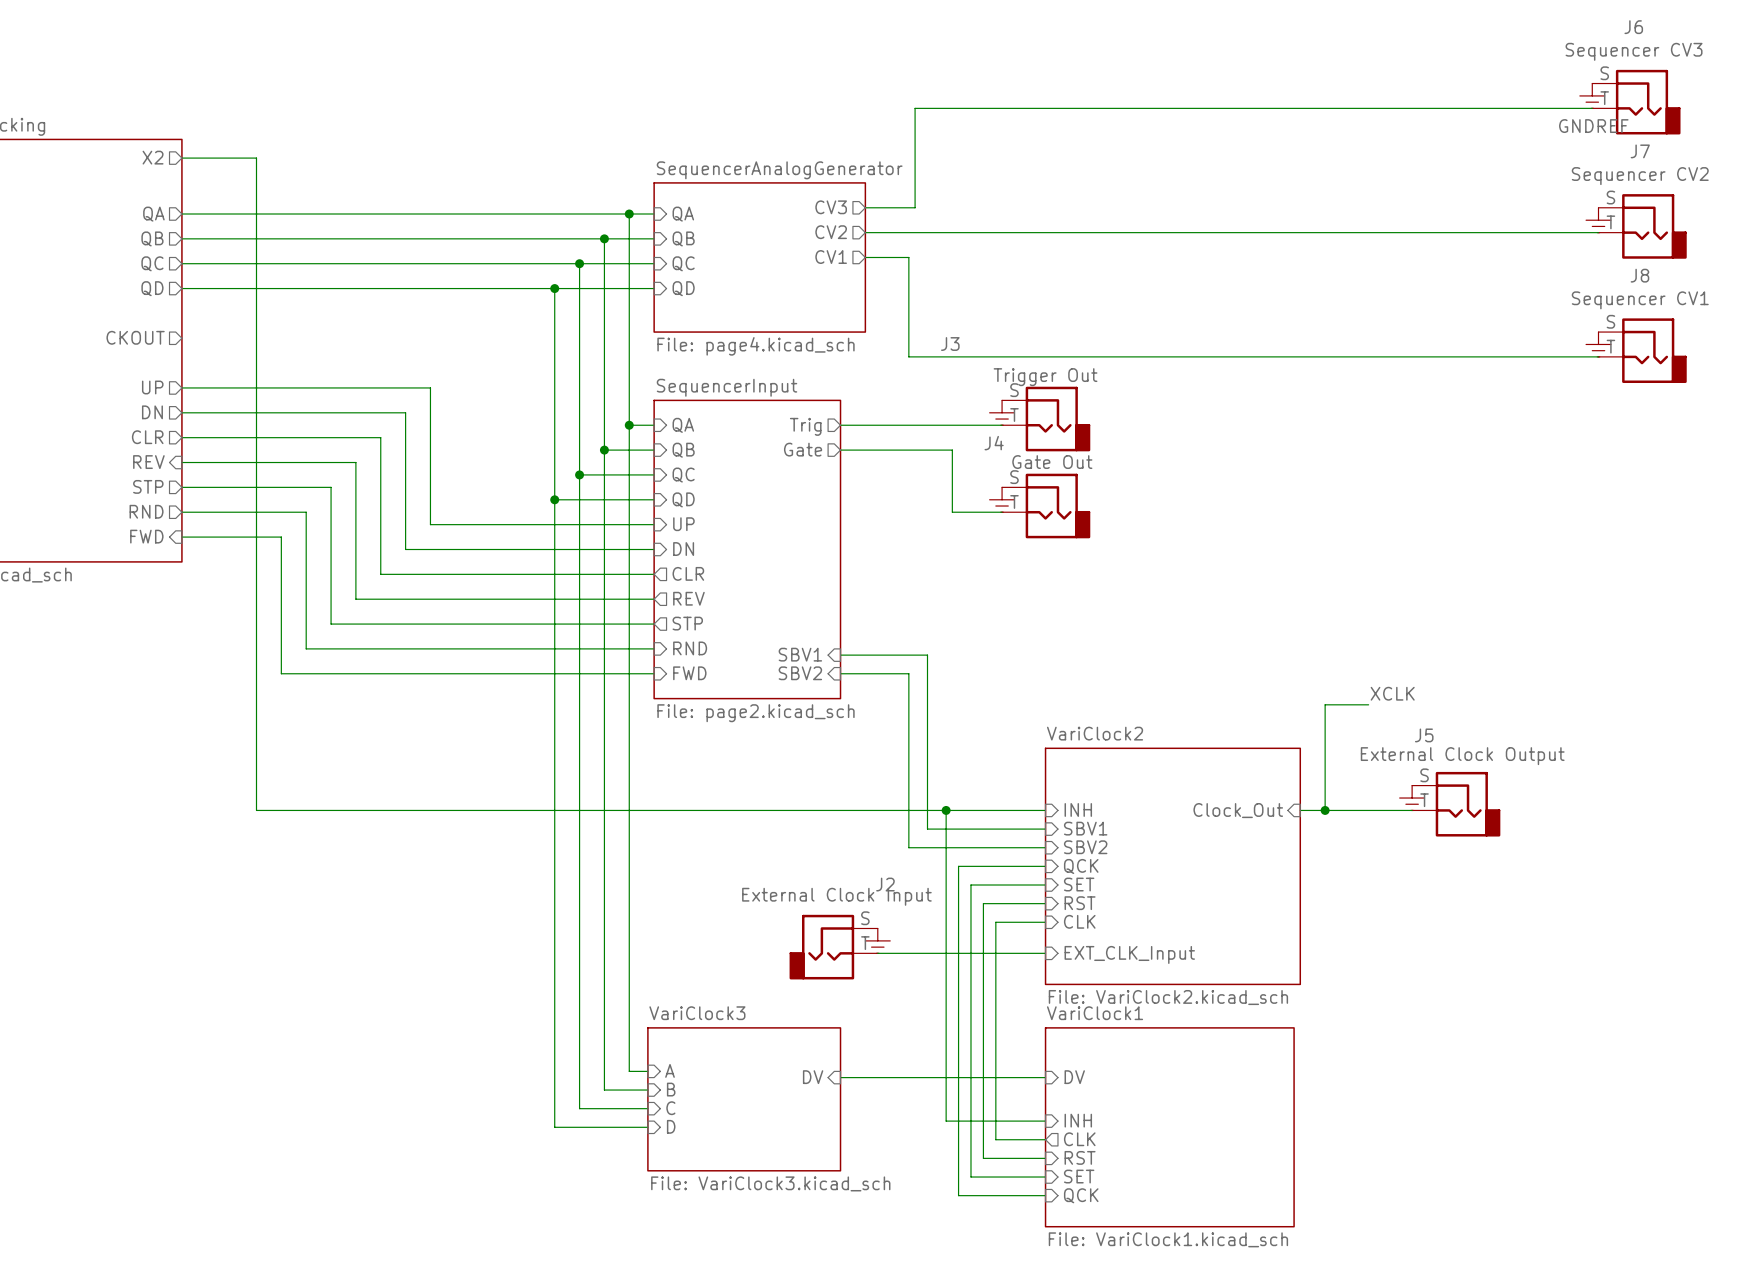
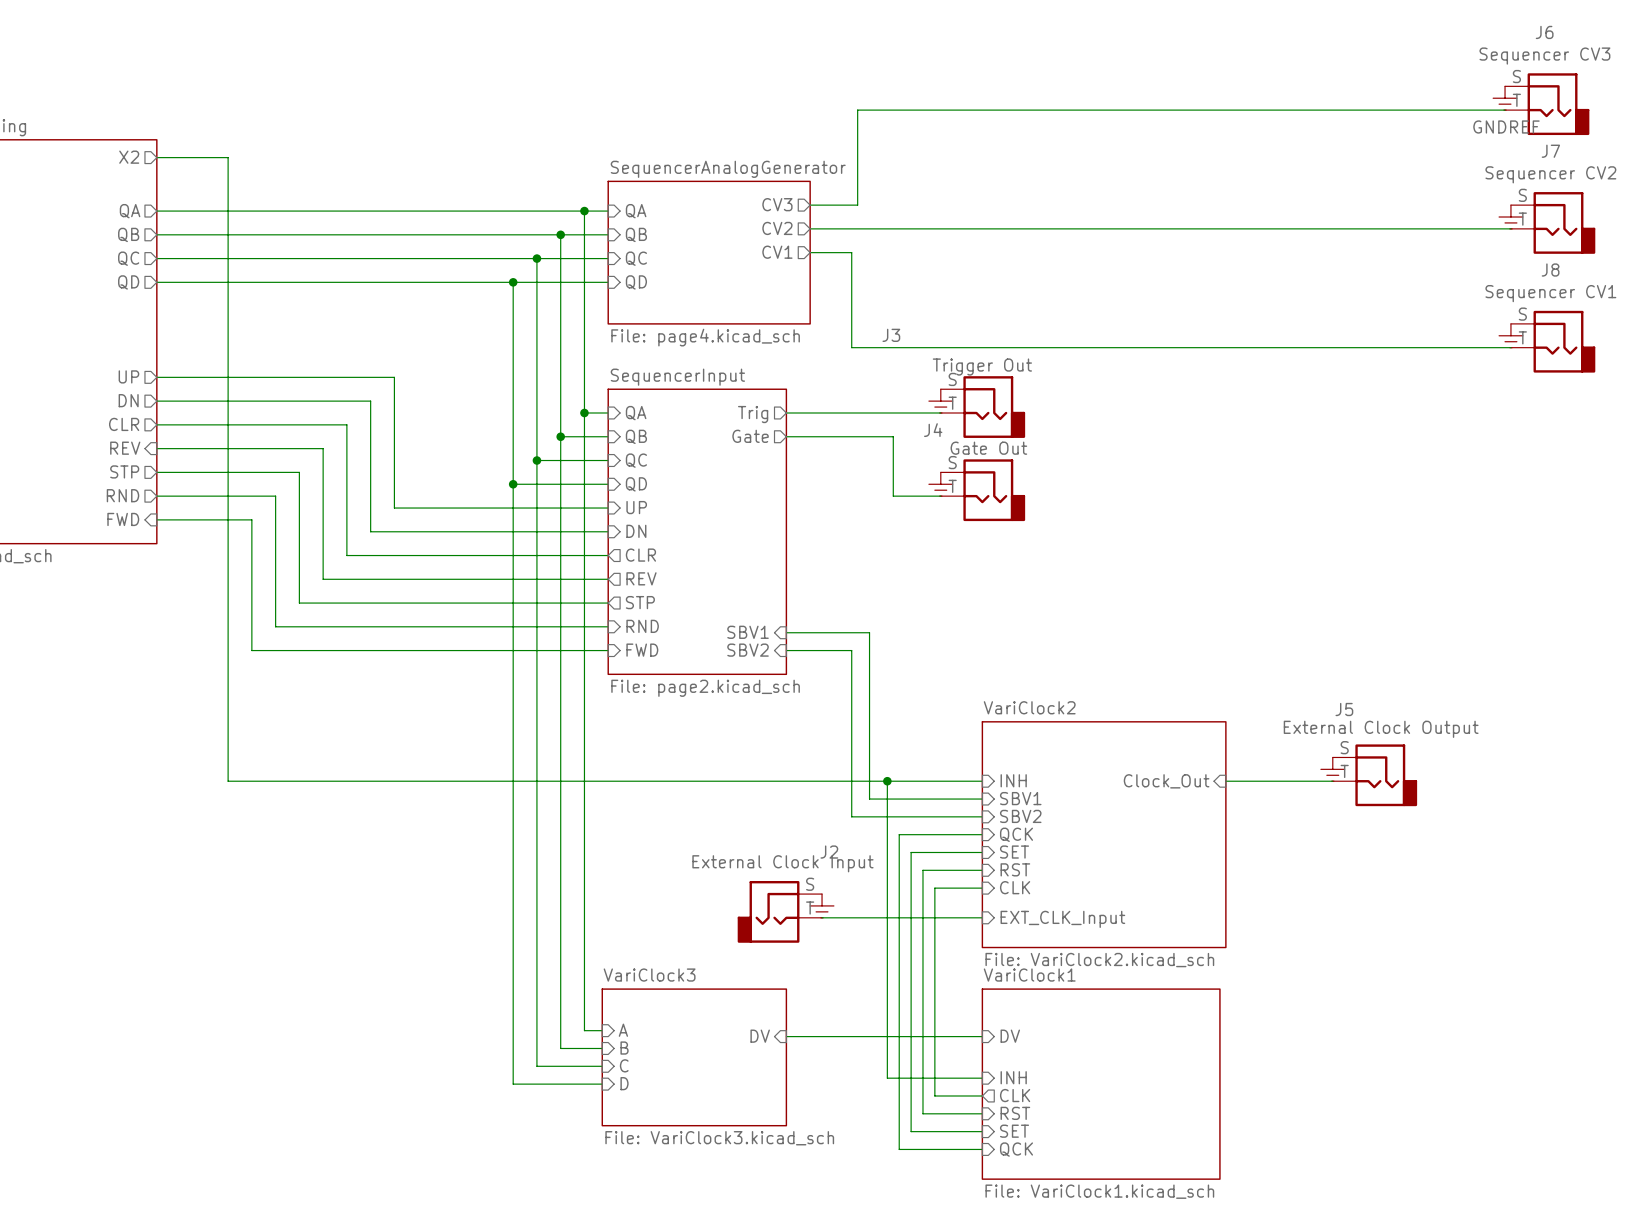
sheet pin: CKOUT (135, 337) -> none
label: XCLK (1392, 693) -> none
wire: (1368, 704) (1325, 704) (1325, 810) -> none
junction: (1325, 810) -> none

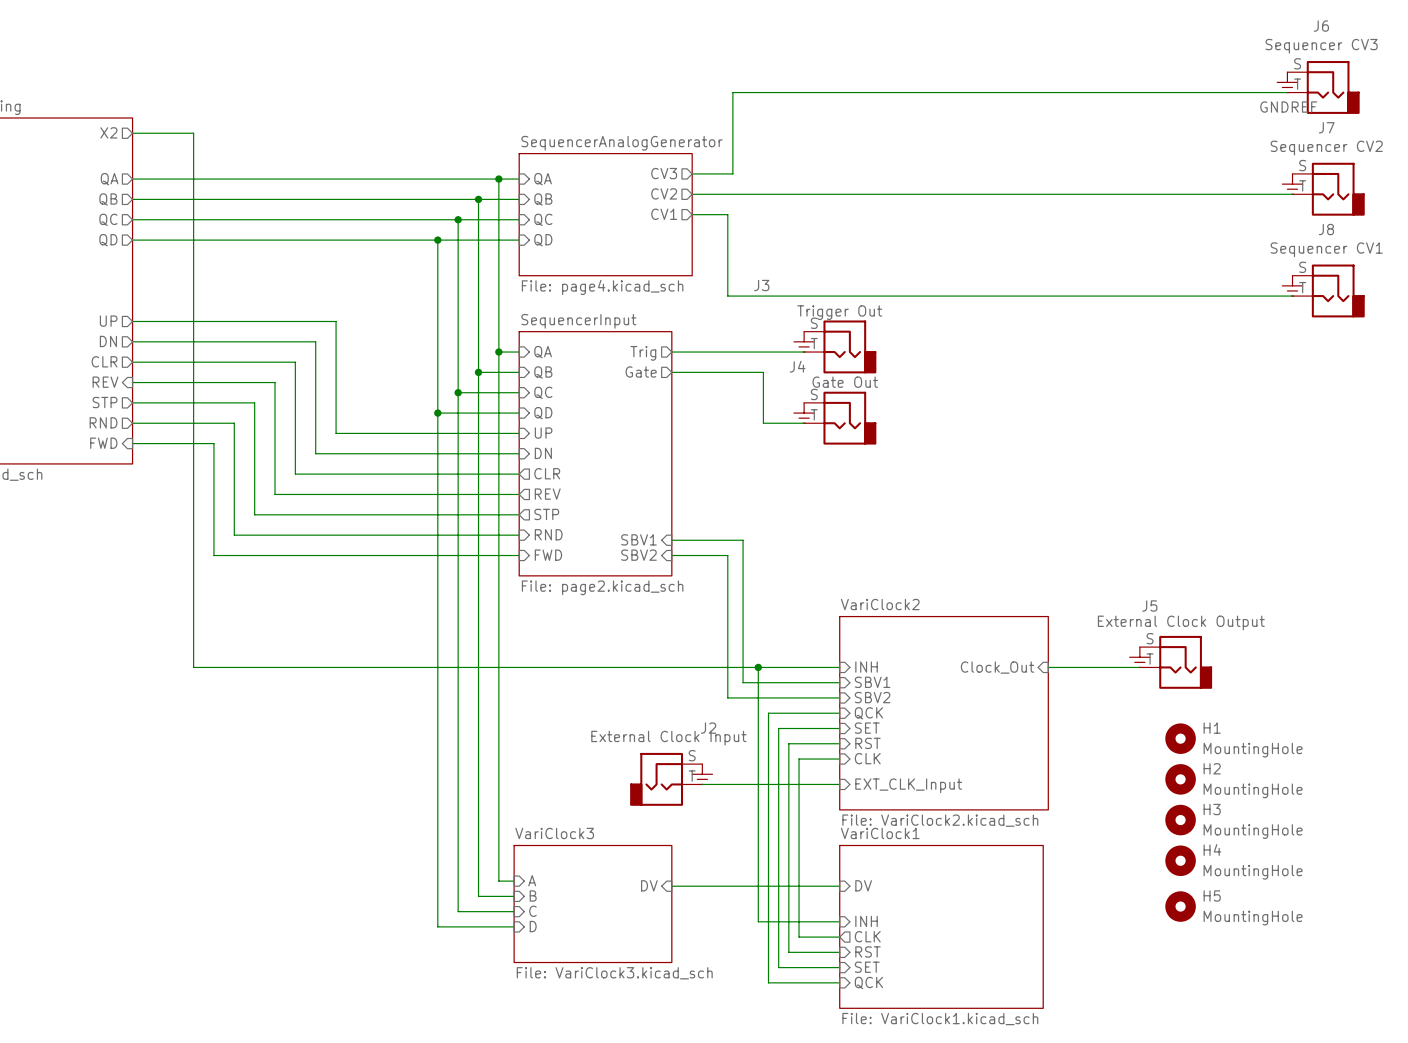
H1: none -> MountingHole (1180, 738)
H2: none -> MountingHole (1180, 779)
H3: none -> MountingHole (1180, 820)
H4: none -> MountingHole (1180, 860)
H5: none -> MountingHole (1180, 906)

